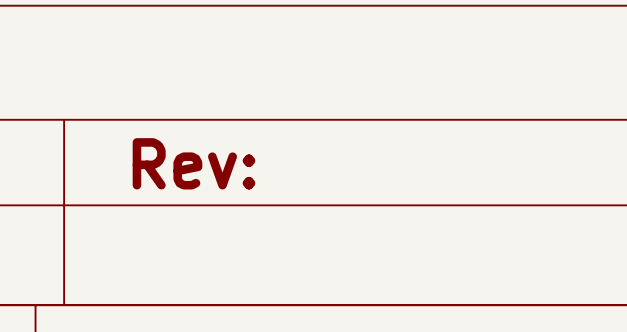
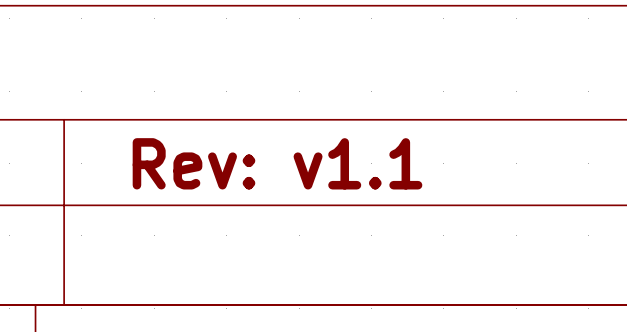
title block: Rev: (193, 163) -> Rev: v1.1 (277, 163)

